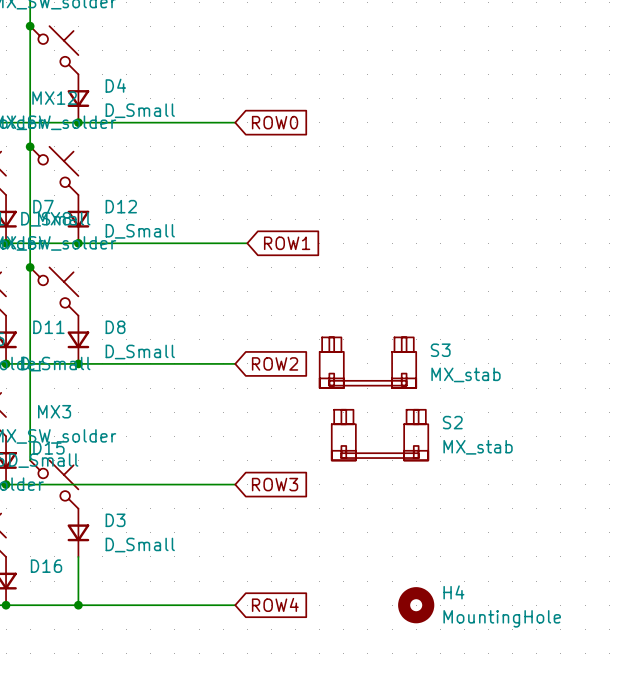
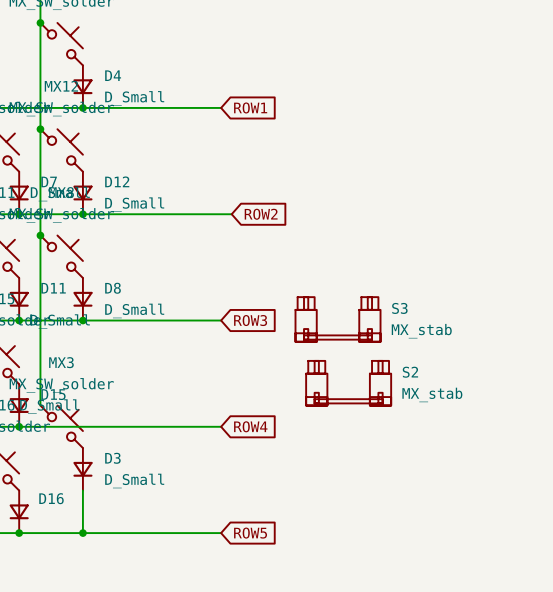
global label: ROW0 (275, 122) -> ROW1 (250, 107)
global label: ROW1 (287, 243) -> ROW2 (261, 214)
global label: ROW2 (275, 363) -> ROW3 (250, 320)
global label: ROW3 (275, 484) -> ROW4 (250, 426)
global label: ROW4 (275, 604) -> ROW5 (250, 533)
H4: MountingHole (416, 605) -> none

